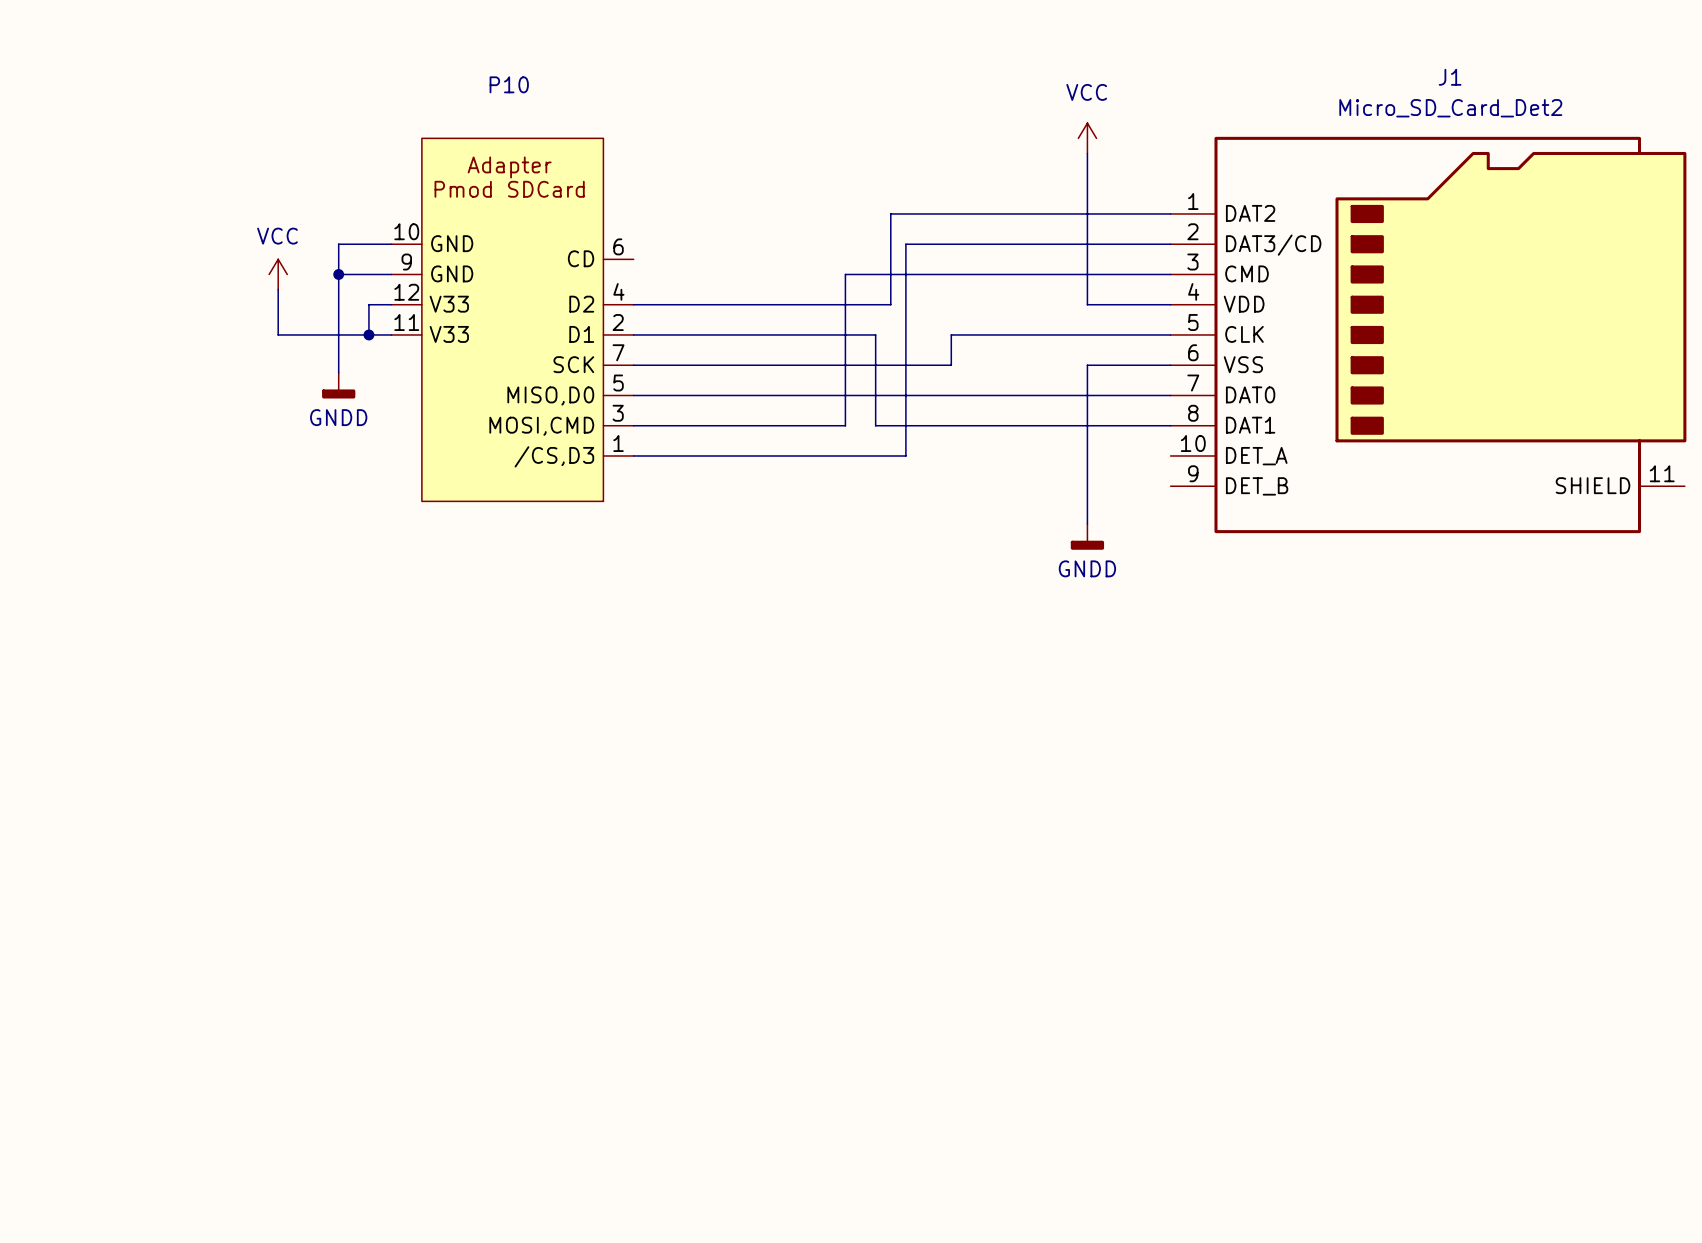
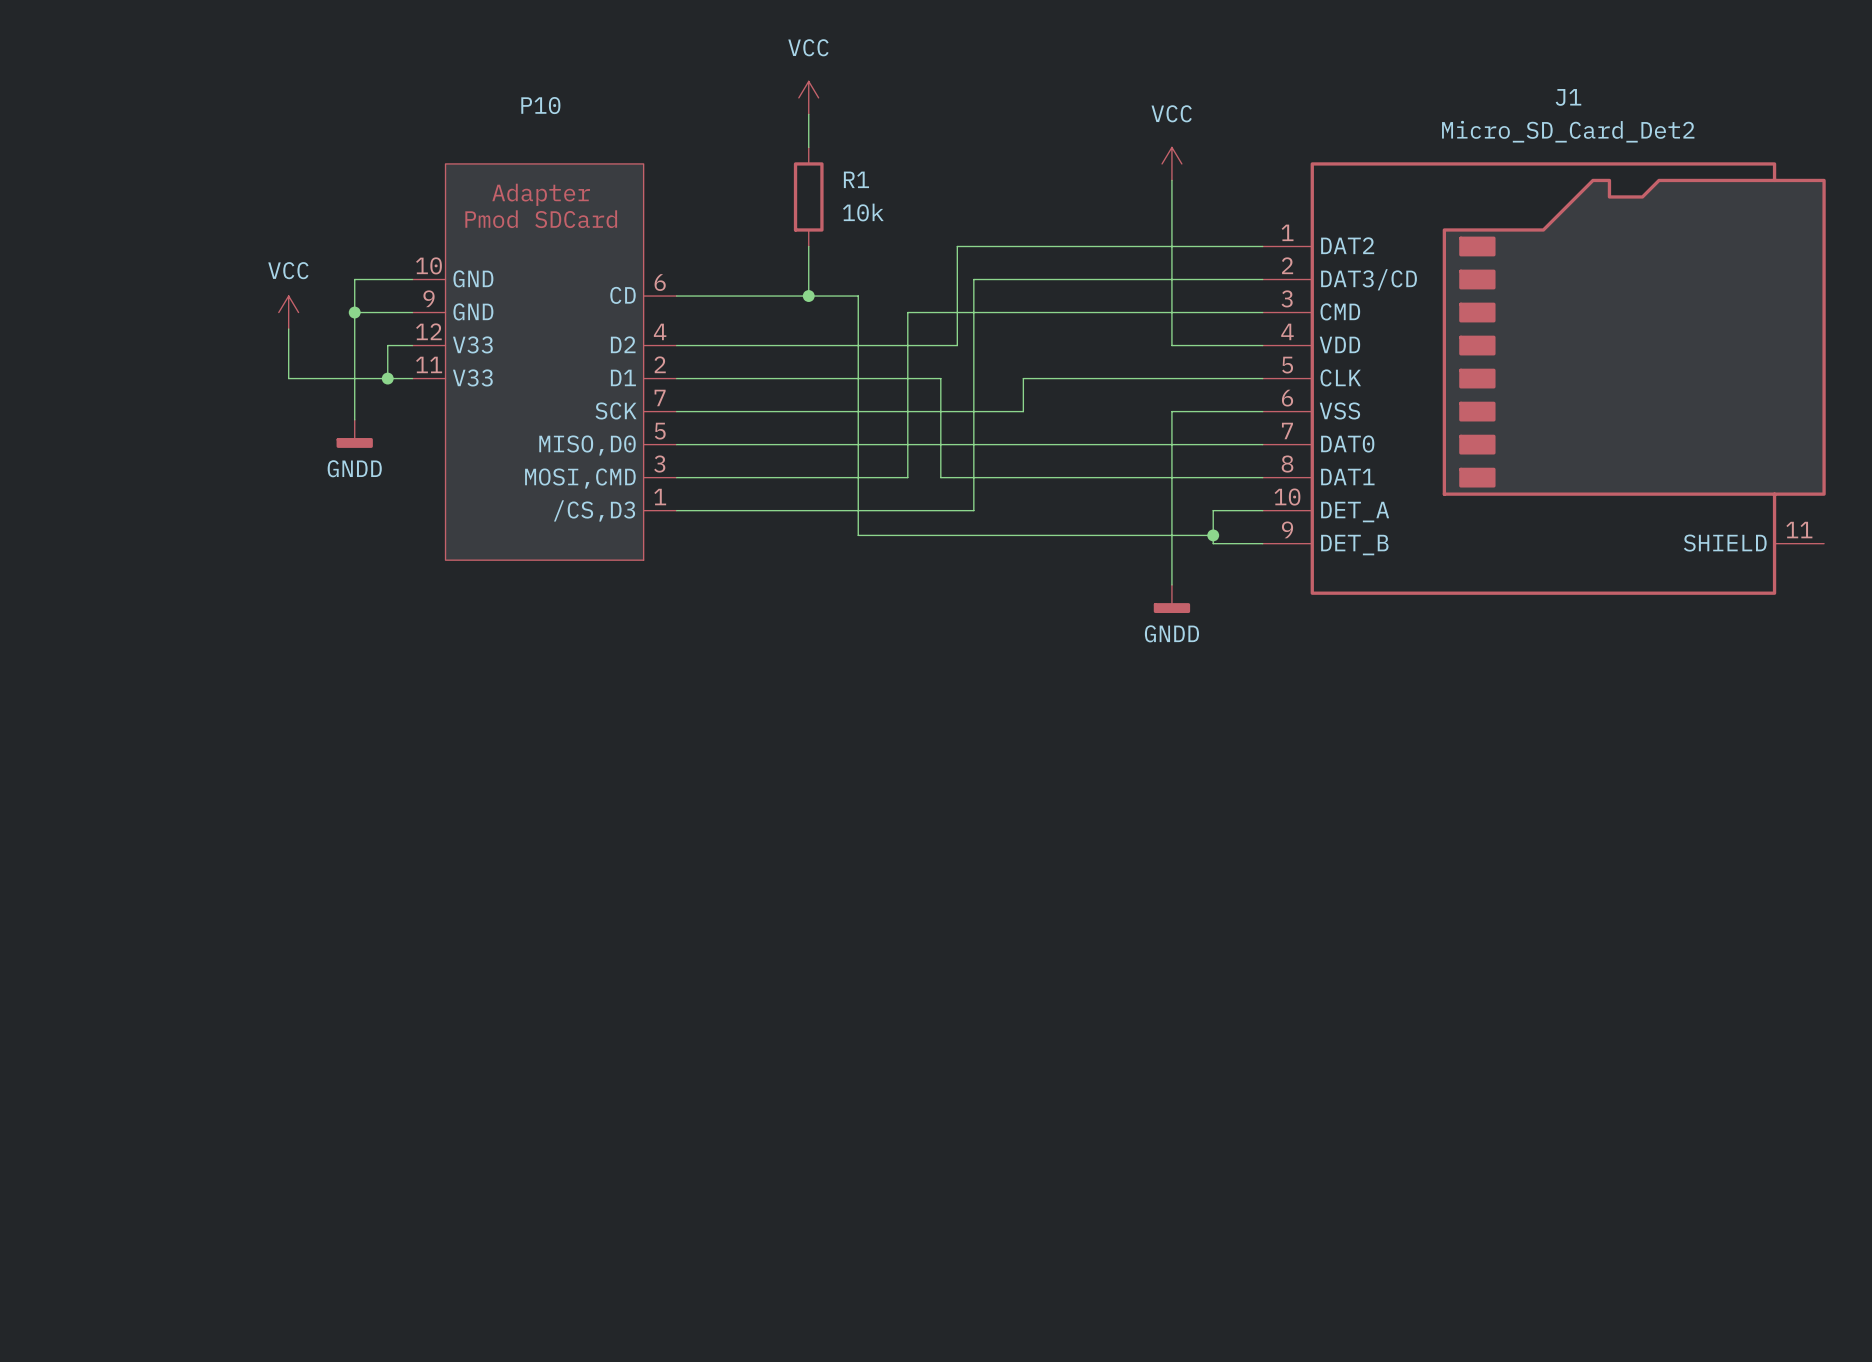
power symbol: none -> VCC (808, 97)
wire: none -> (808, 114) (808, 147)
R1: none -> 10k (808, 196)
wire: none -> (808, 246) (808, 296)
wire: none -> (676, 296) (858, 296) (858, 535) (1213, 535)
junction: none -> (808, 296)
wire: none -> (1262, 510) (1213, 510) (1213, 543) (1262, 543)
junction: none -> (1213, 535)

